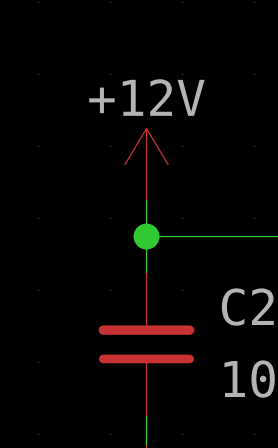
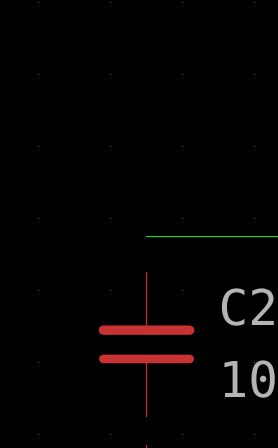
power symbol: +12V (146, 164) -> none
wire: (146, 200) (146, 272) -> none
junction: (146, 236) -> none
wire: (146, 416) (146, 445) -> none

